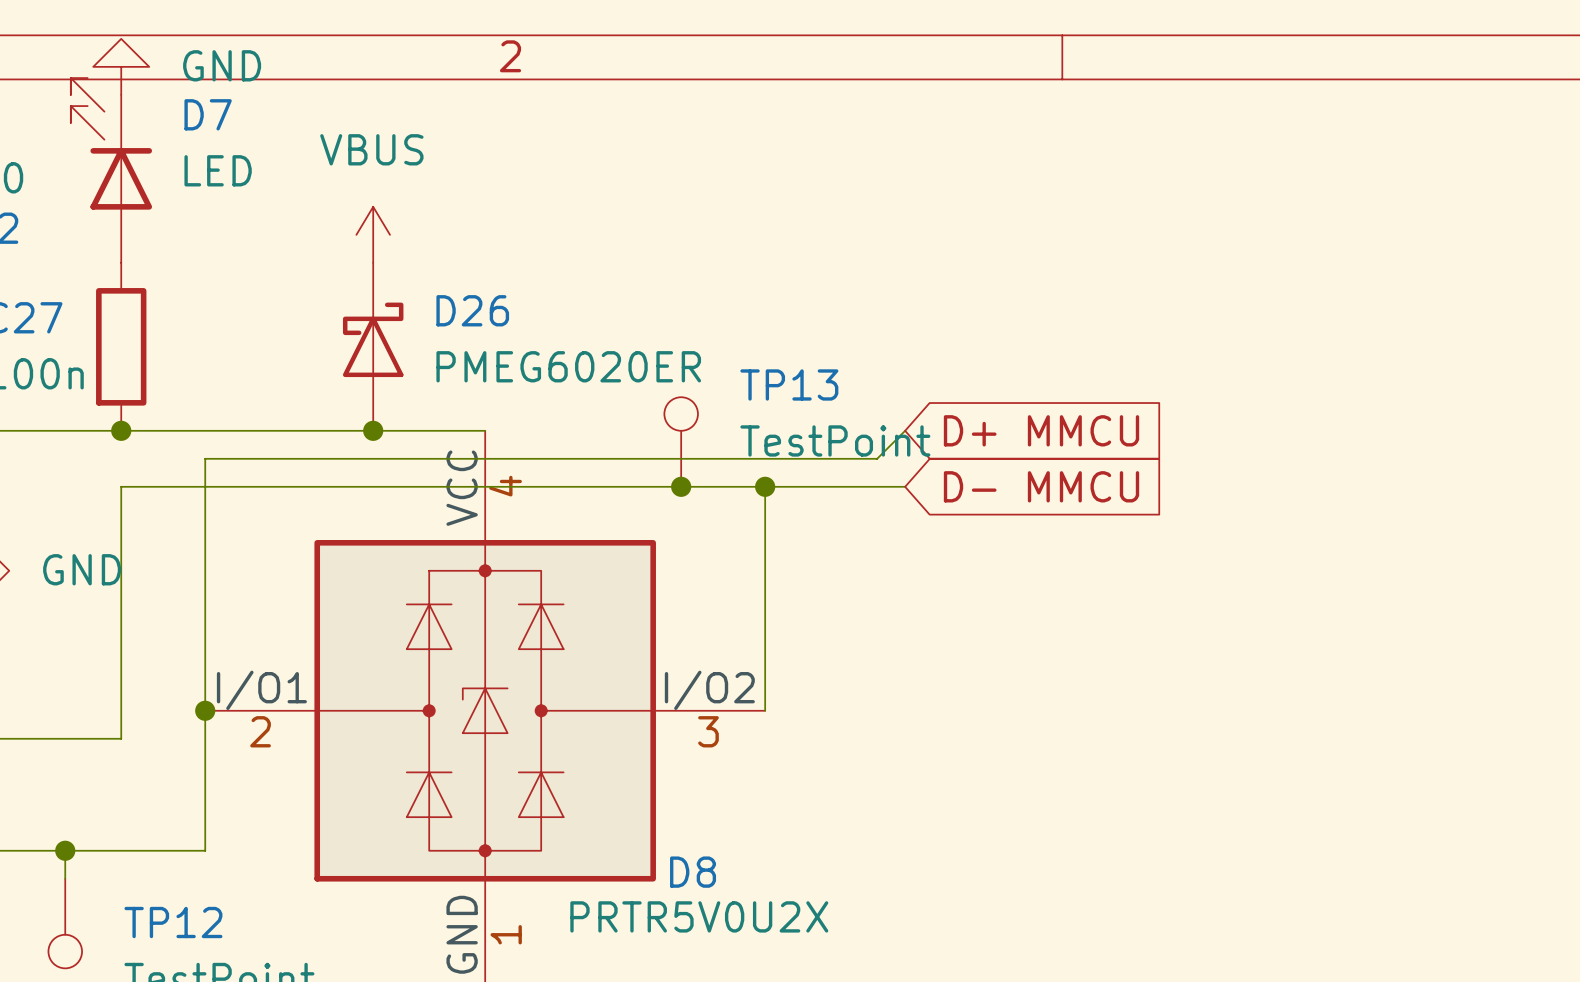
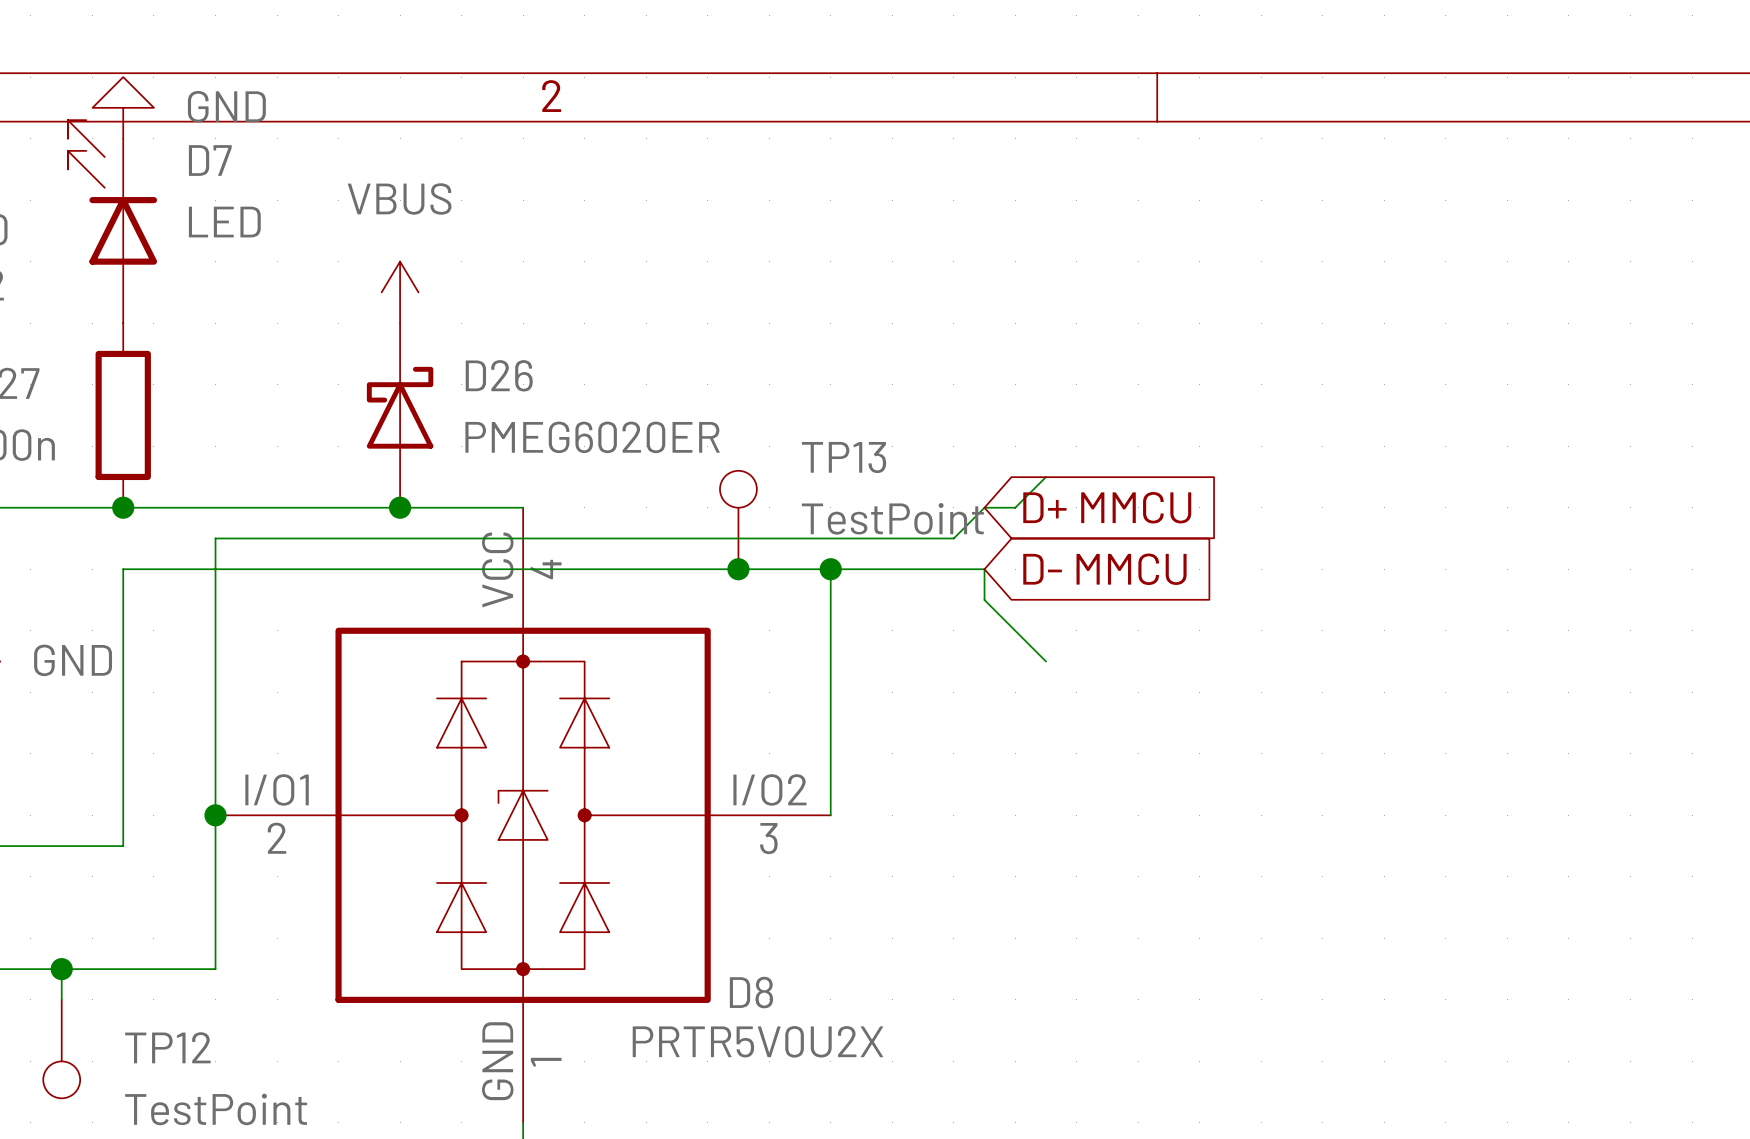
wire: none -> (1046, 476) (1015, 507) (984, 507)
wire: none -> (984, 569) (984, 600) (1046, 661)

